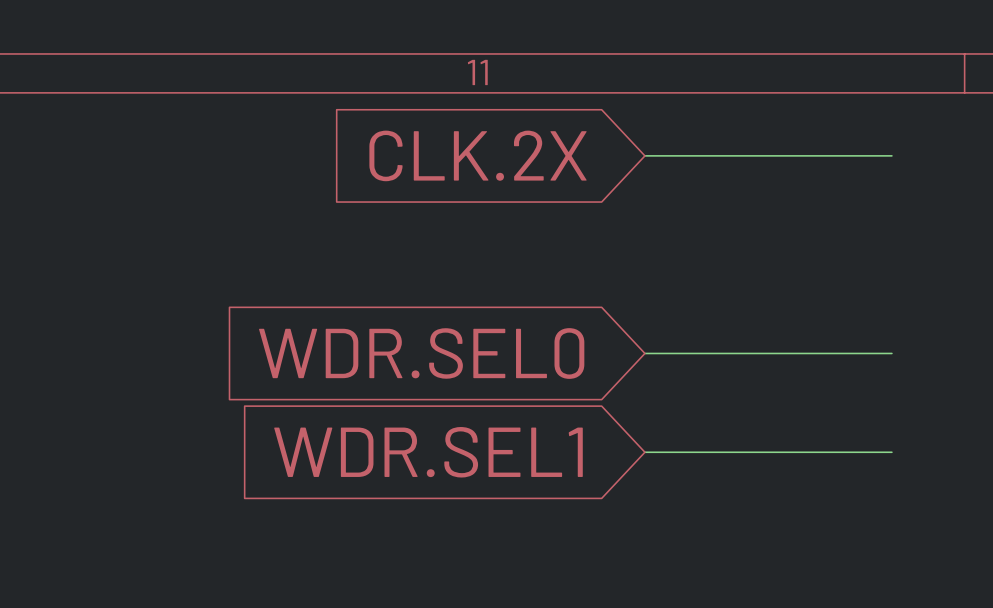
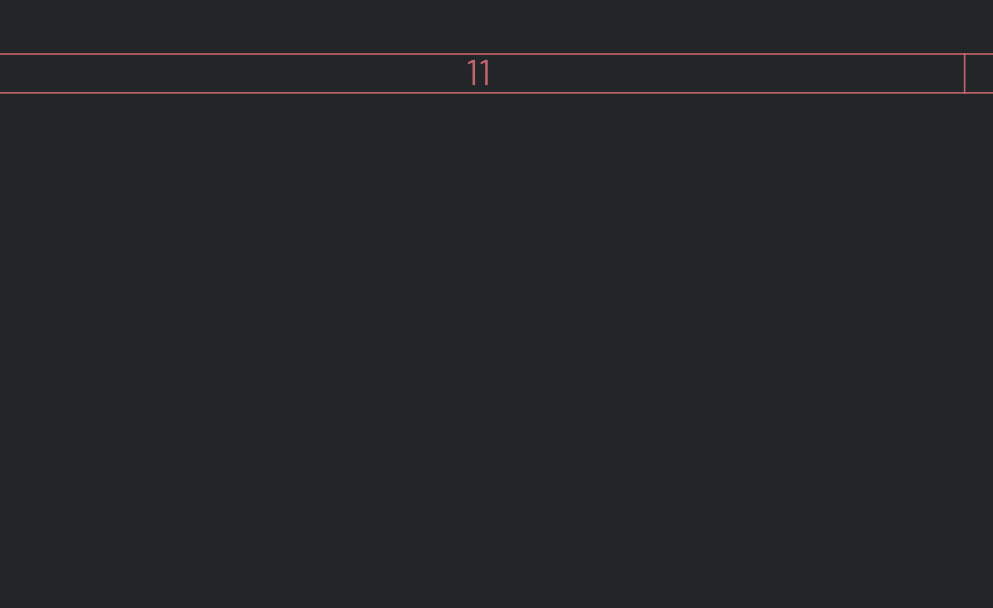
global label: CLK.2X (478, 155) -> none
wire: (644, 155) (891, 155) -> none
global label: WDR.SEL0 (421, 353) -> none
wire: (644, 353) (891, 353) -> none
global label: WDR.SEL1 (428, 452) -> none
wire: (644, 452) (891, 452) -> none

